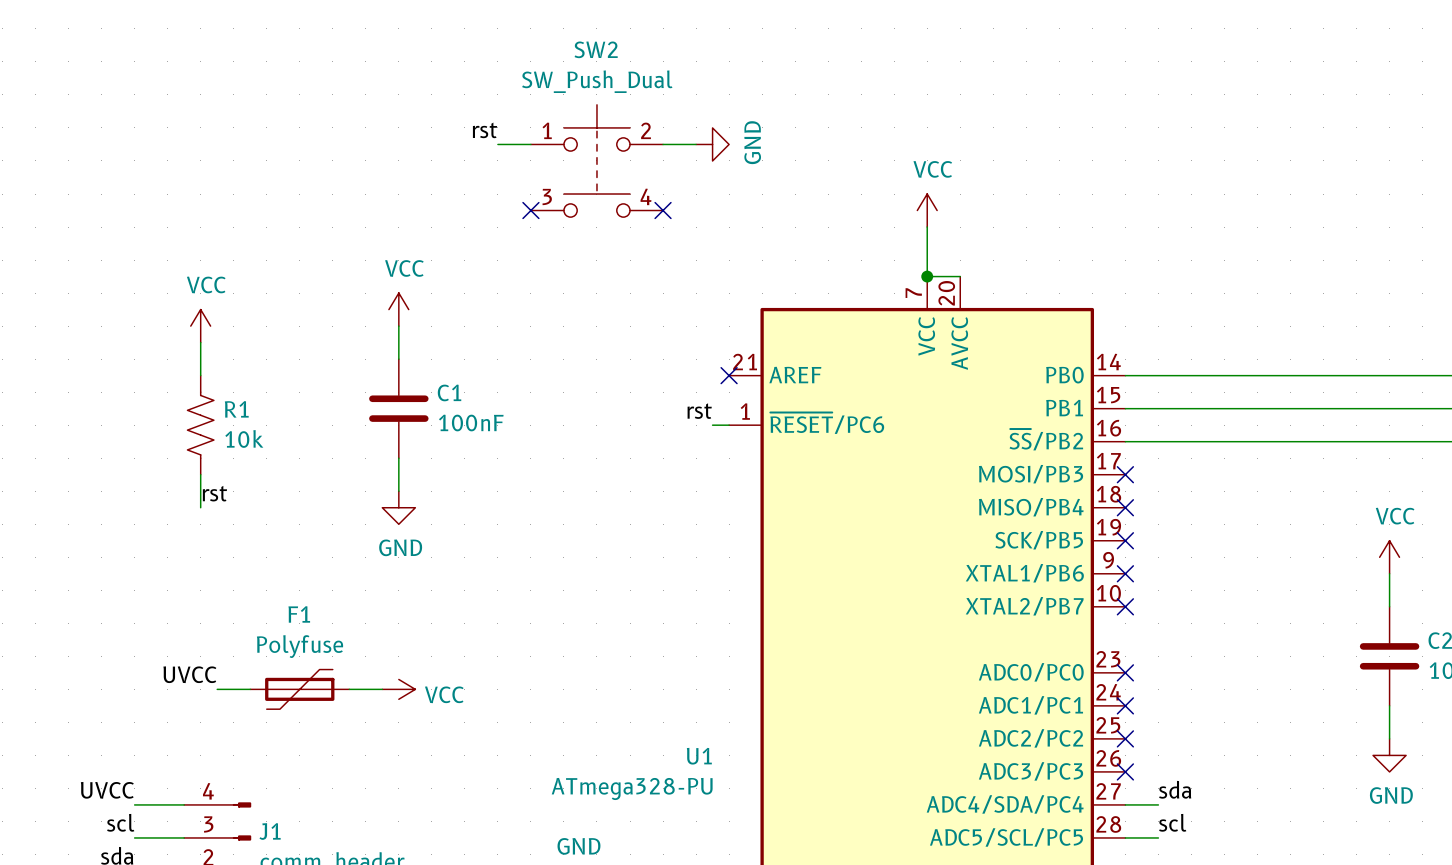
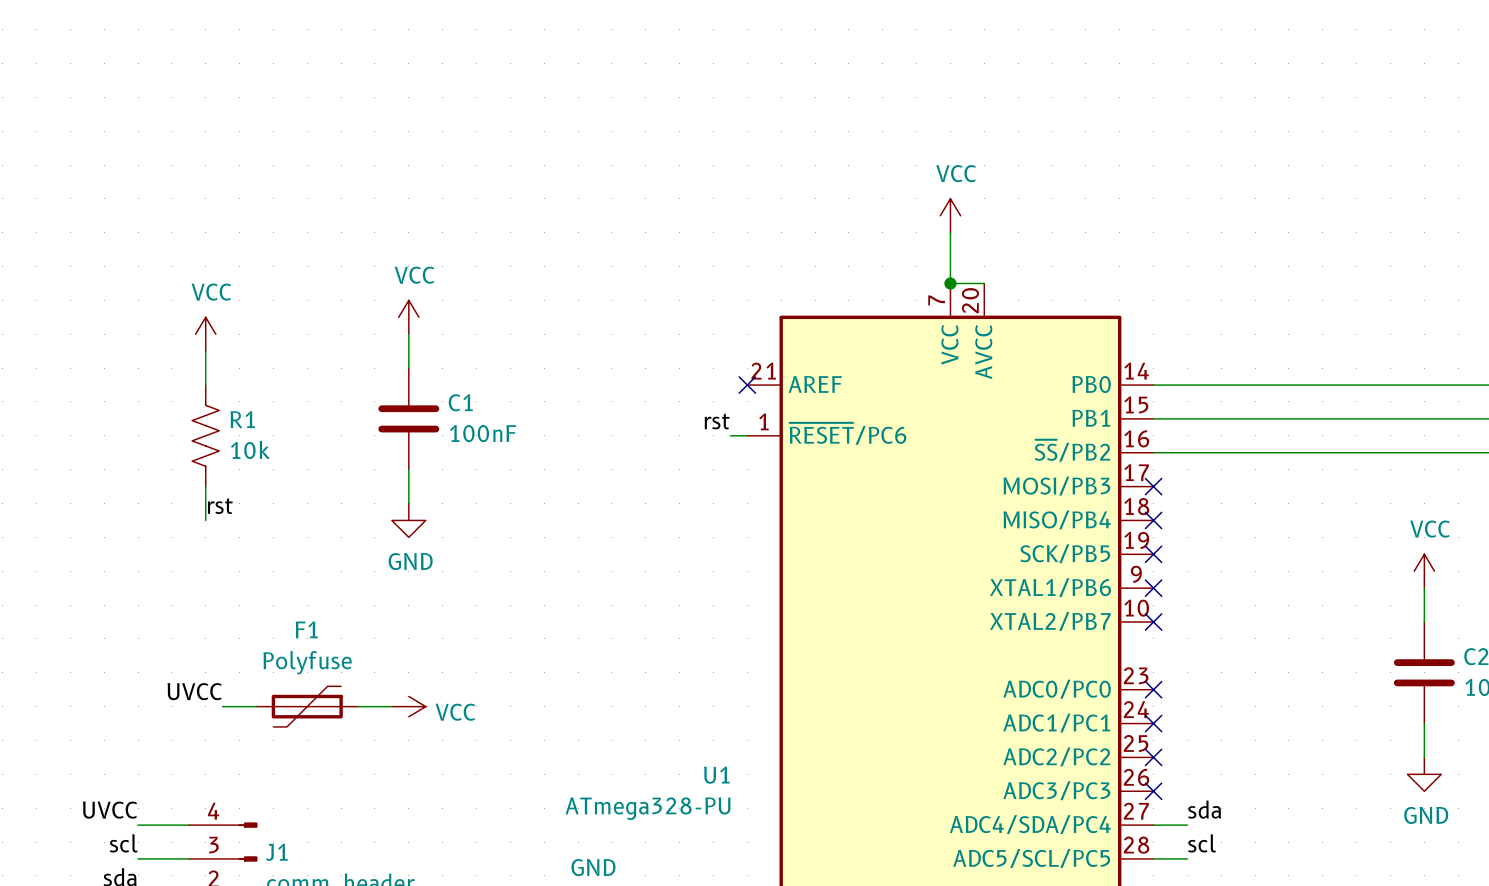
label: rst (485, 130) -> none
wire: (497, 144) (530, 144) -> none
wire: (663, 144) (696, 144) -> none
power symbol: GND (712, 144) -> none
SW2: SW_Push_Dual (596, 160) -> none
no-connect mark: (530, 210) -> none
no-connect mark: (663, 210) -> none

